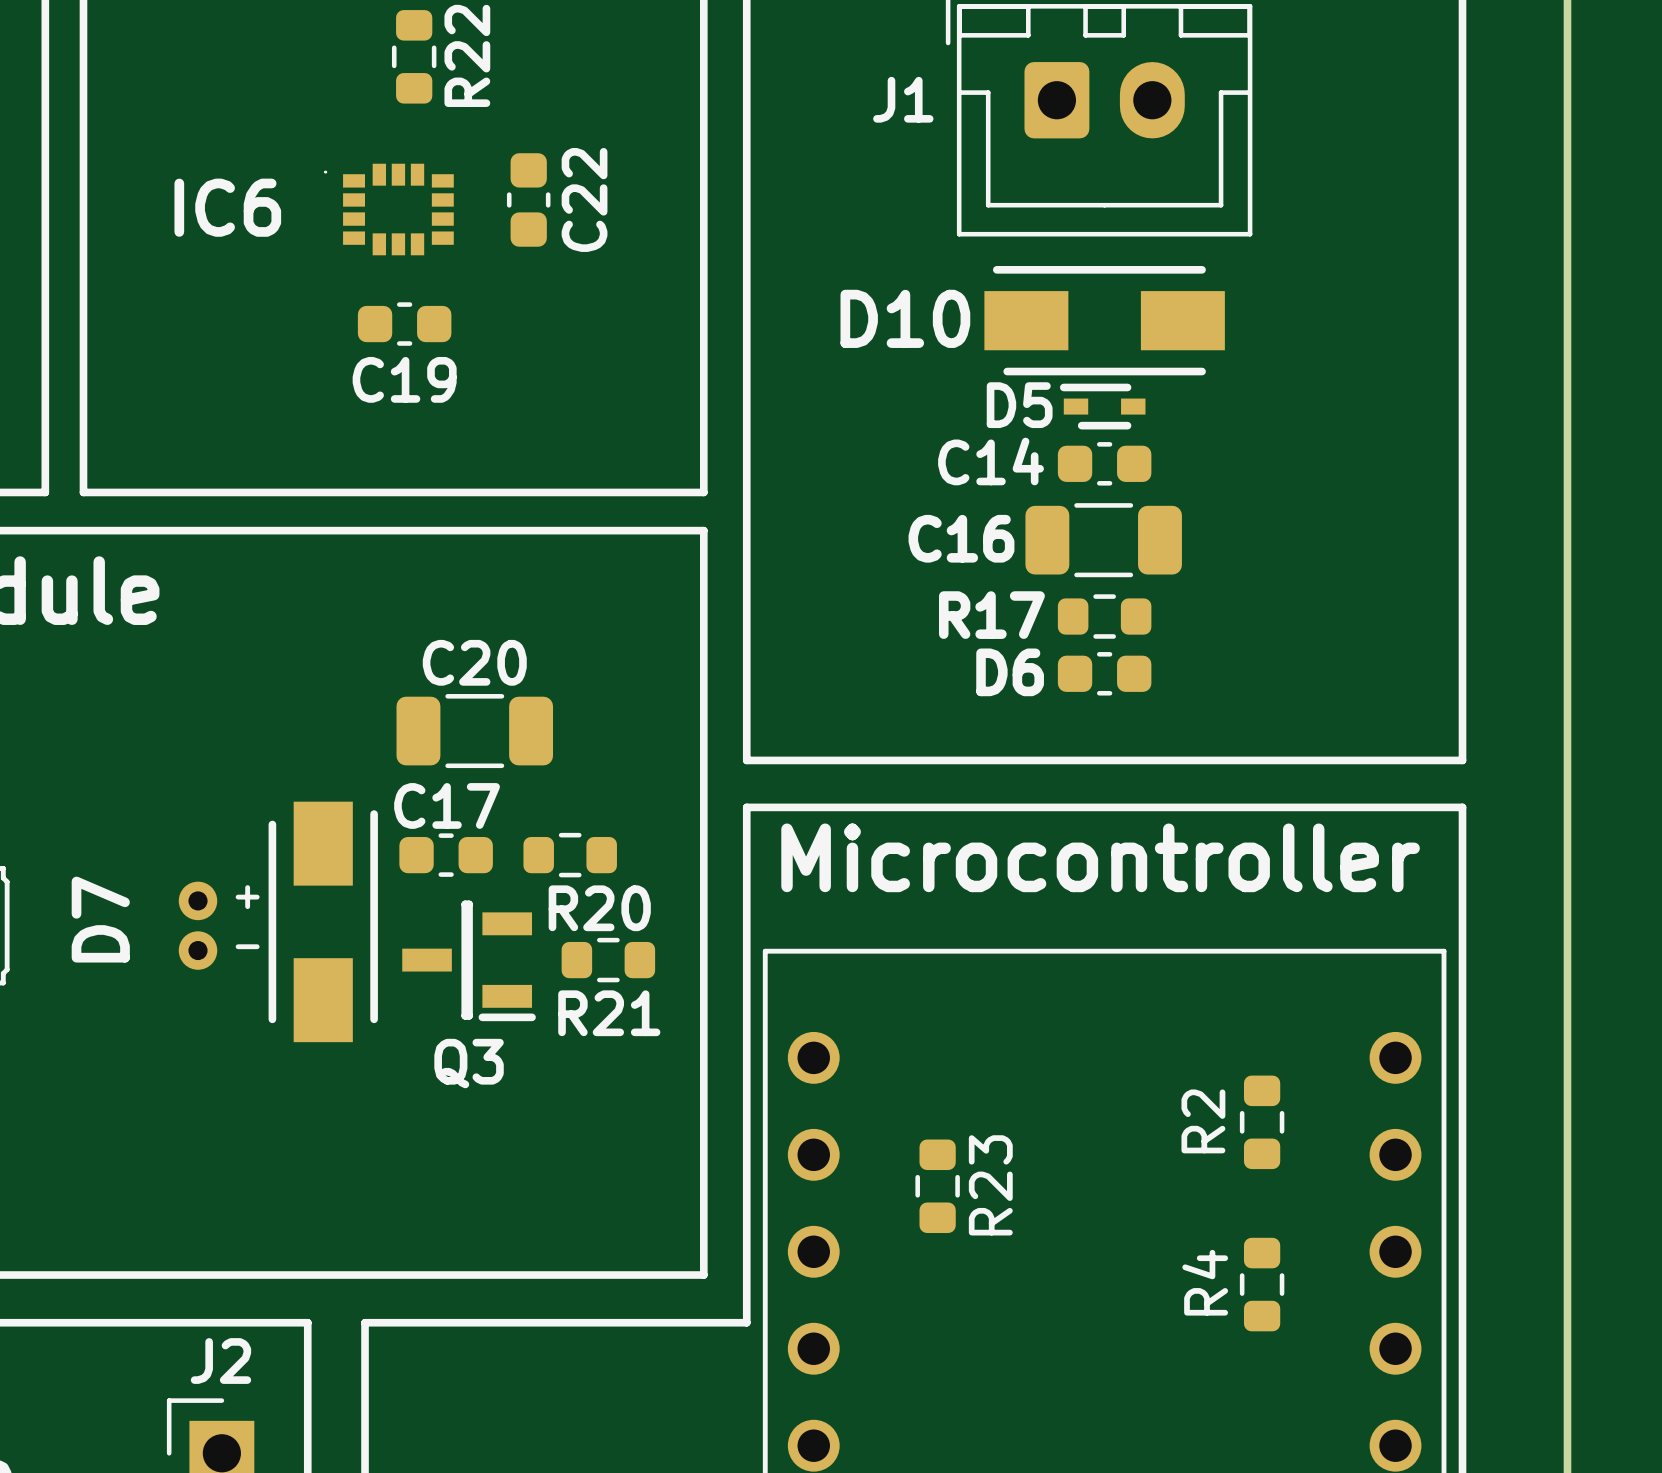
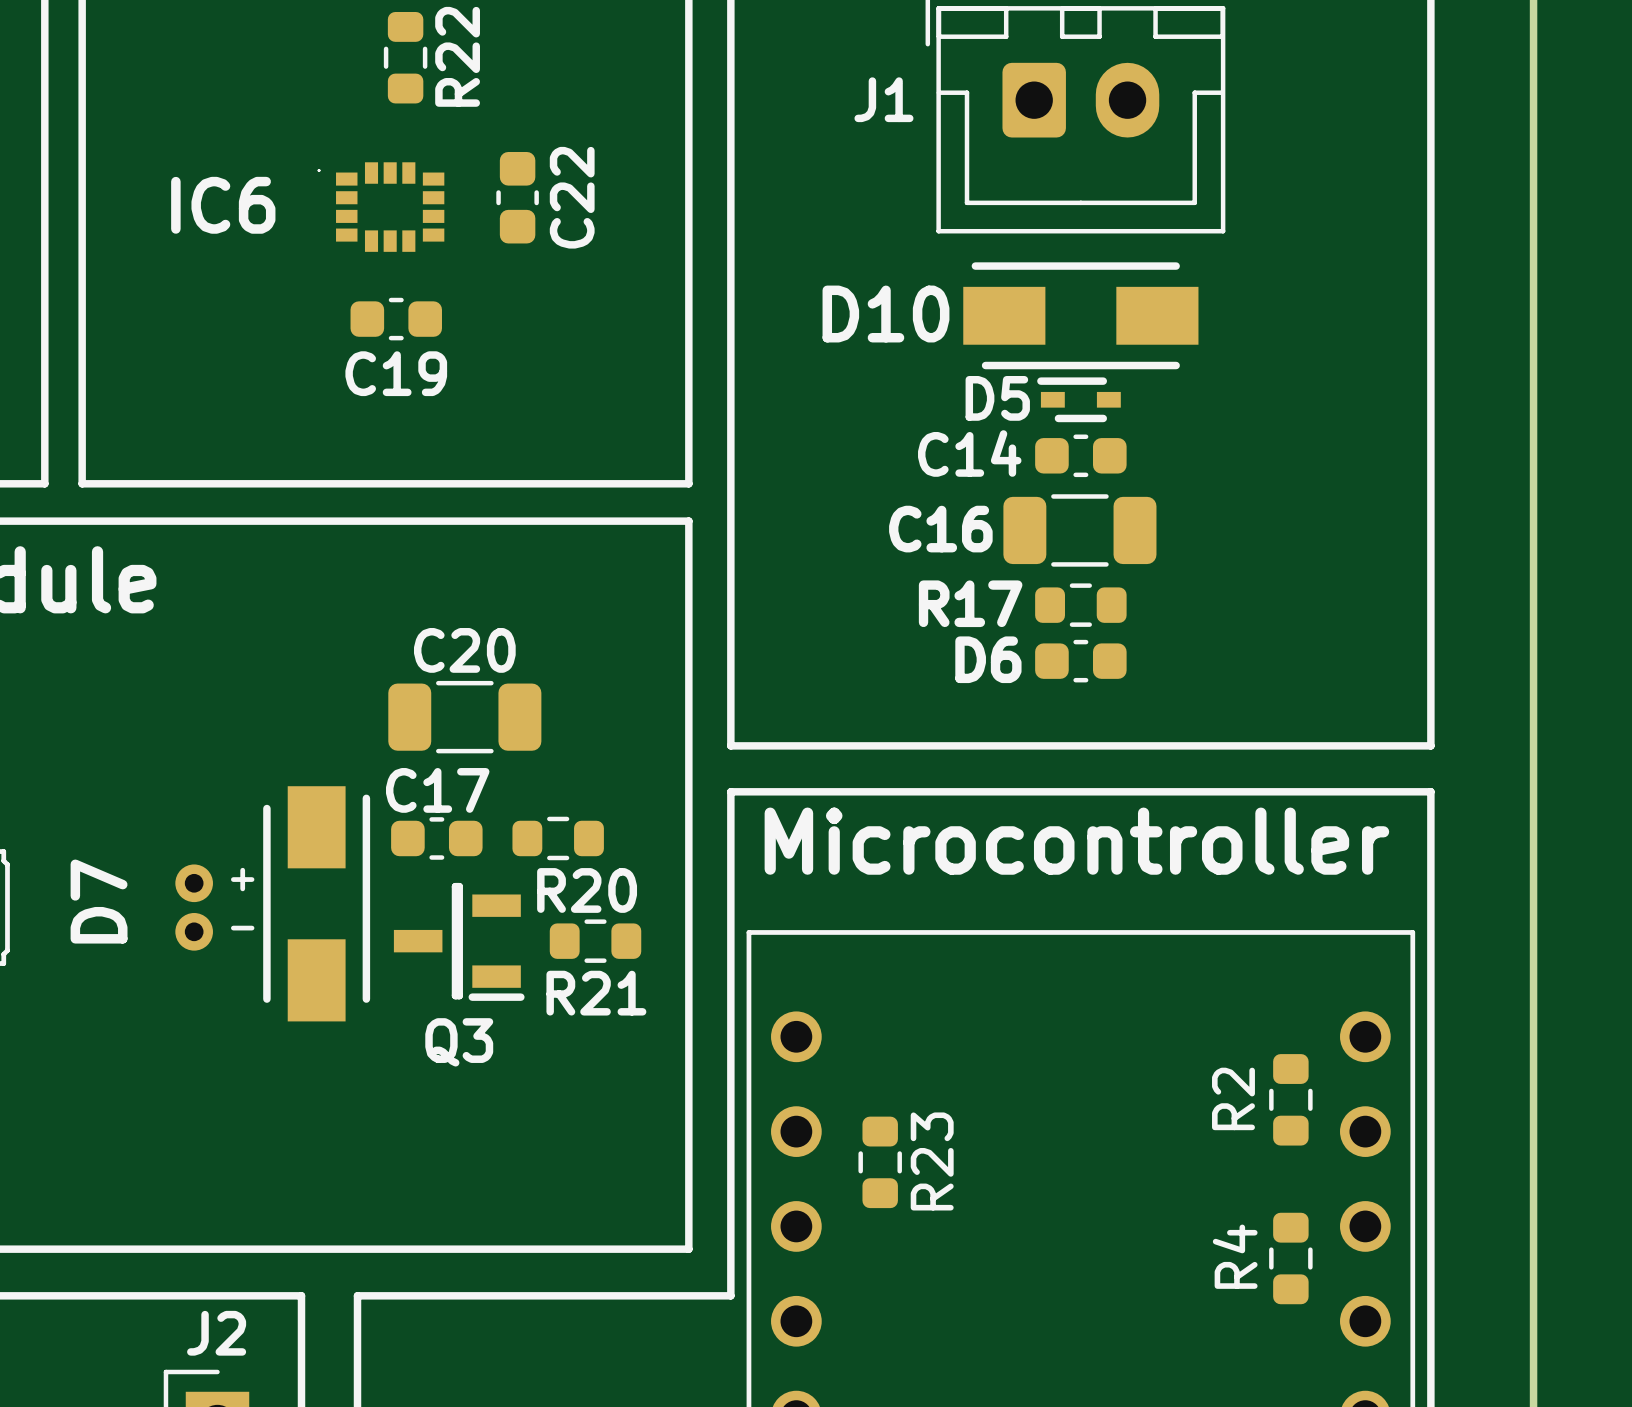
R2 position: (1262, 1122) -> (1290, 1099)
R23 position: (937, 1186) -> (880, 1162)
R4 position: (1262, 1284) -> (1290, 1258)

